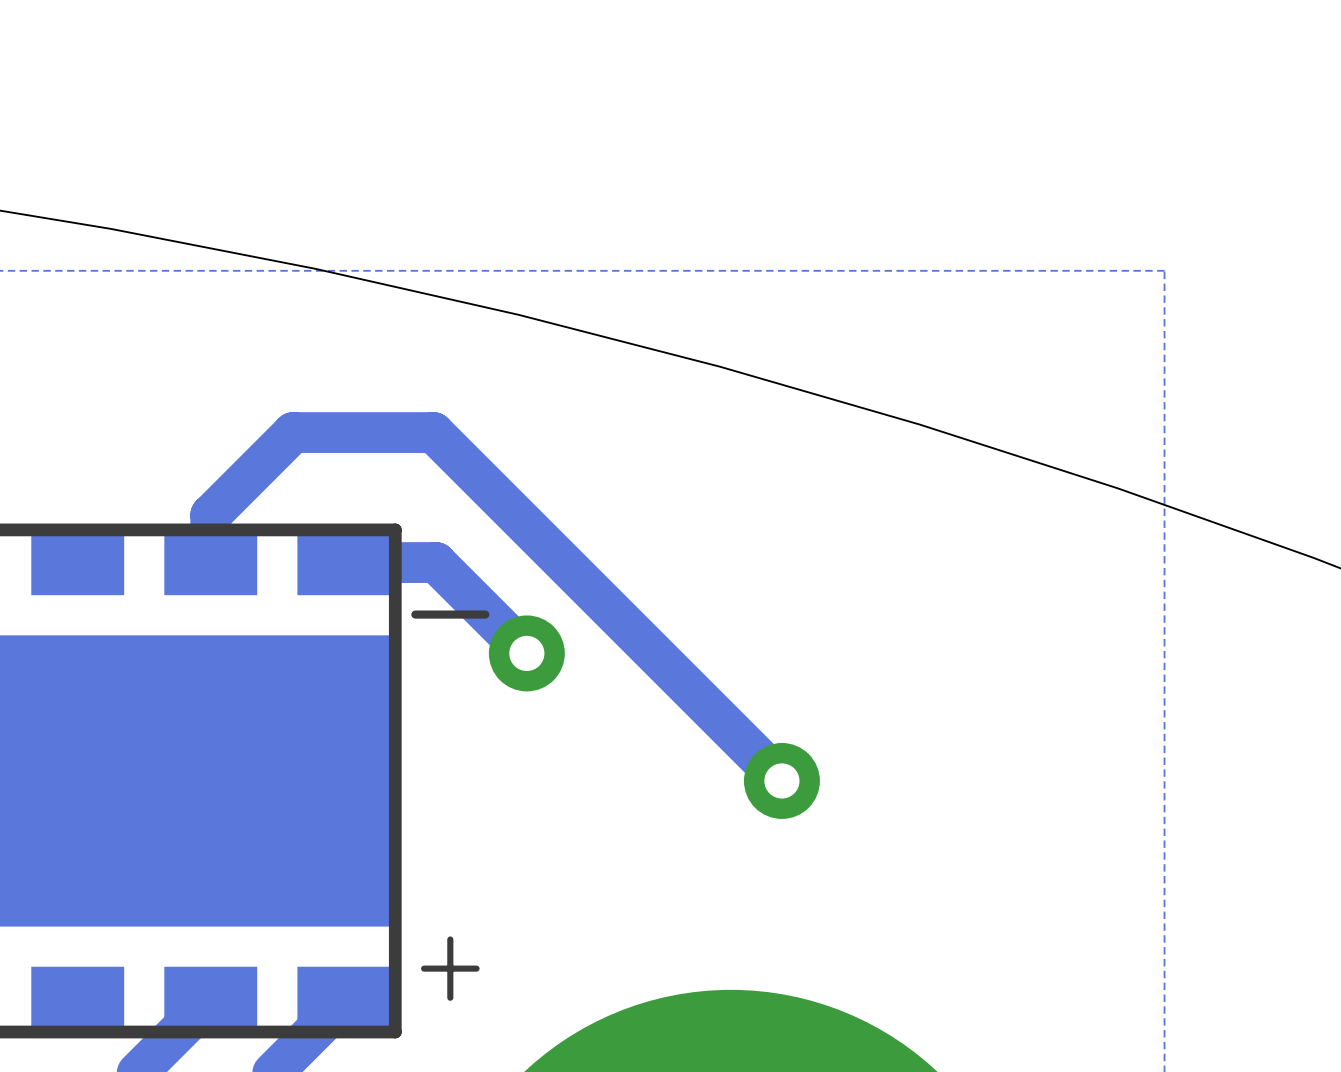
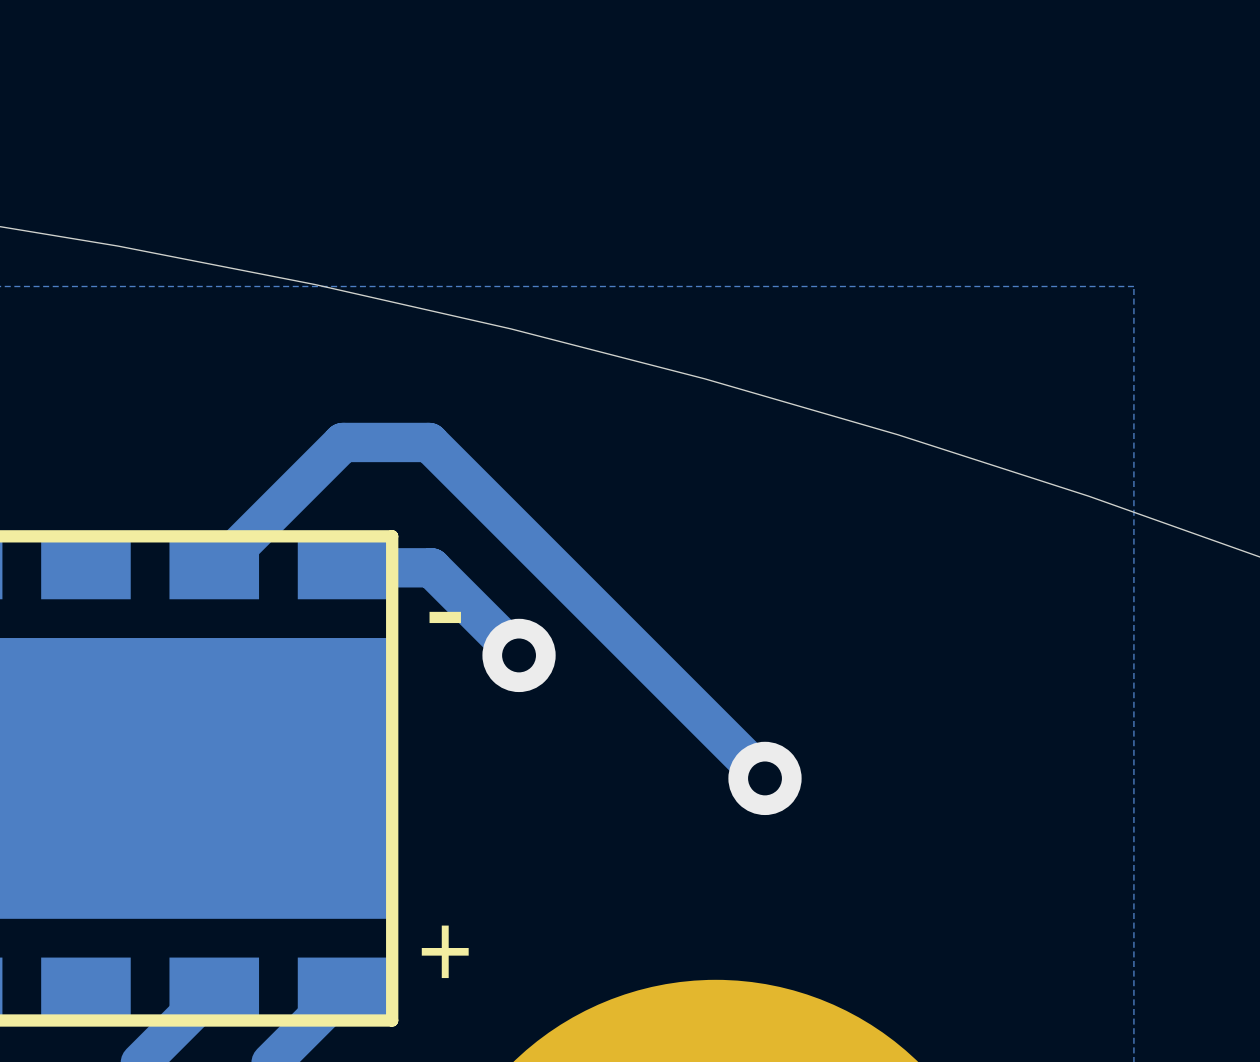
track: (344, 432) (293, 432) (210, 515) (210, 562) -> (342, 442) (217, 567) (214, 567)

